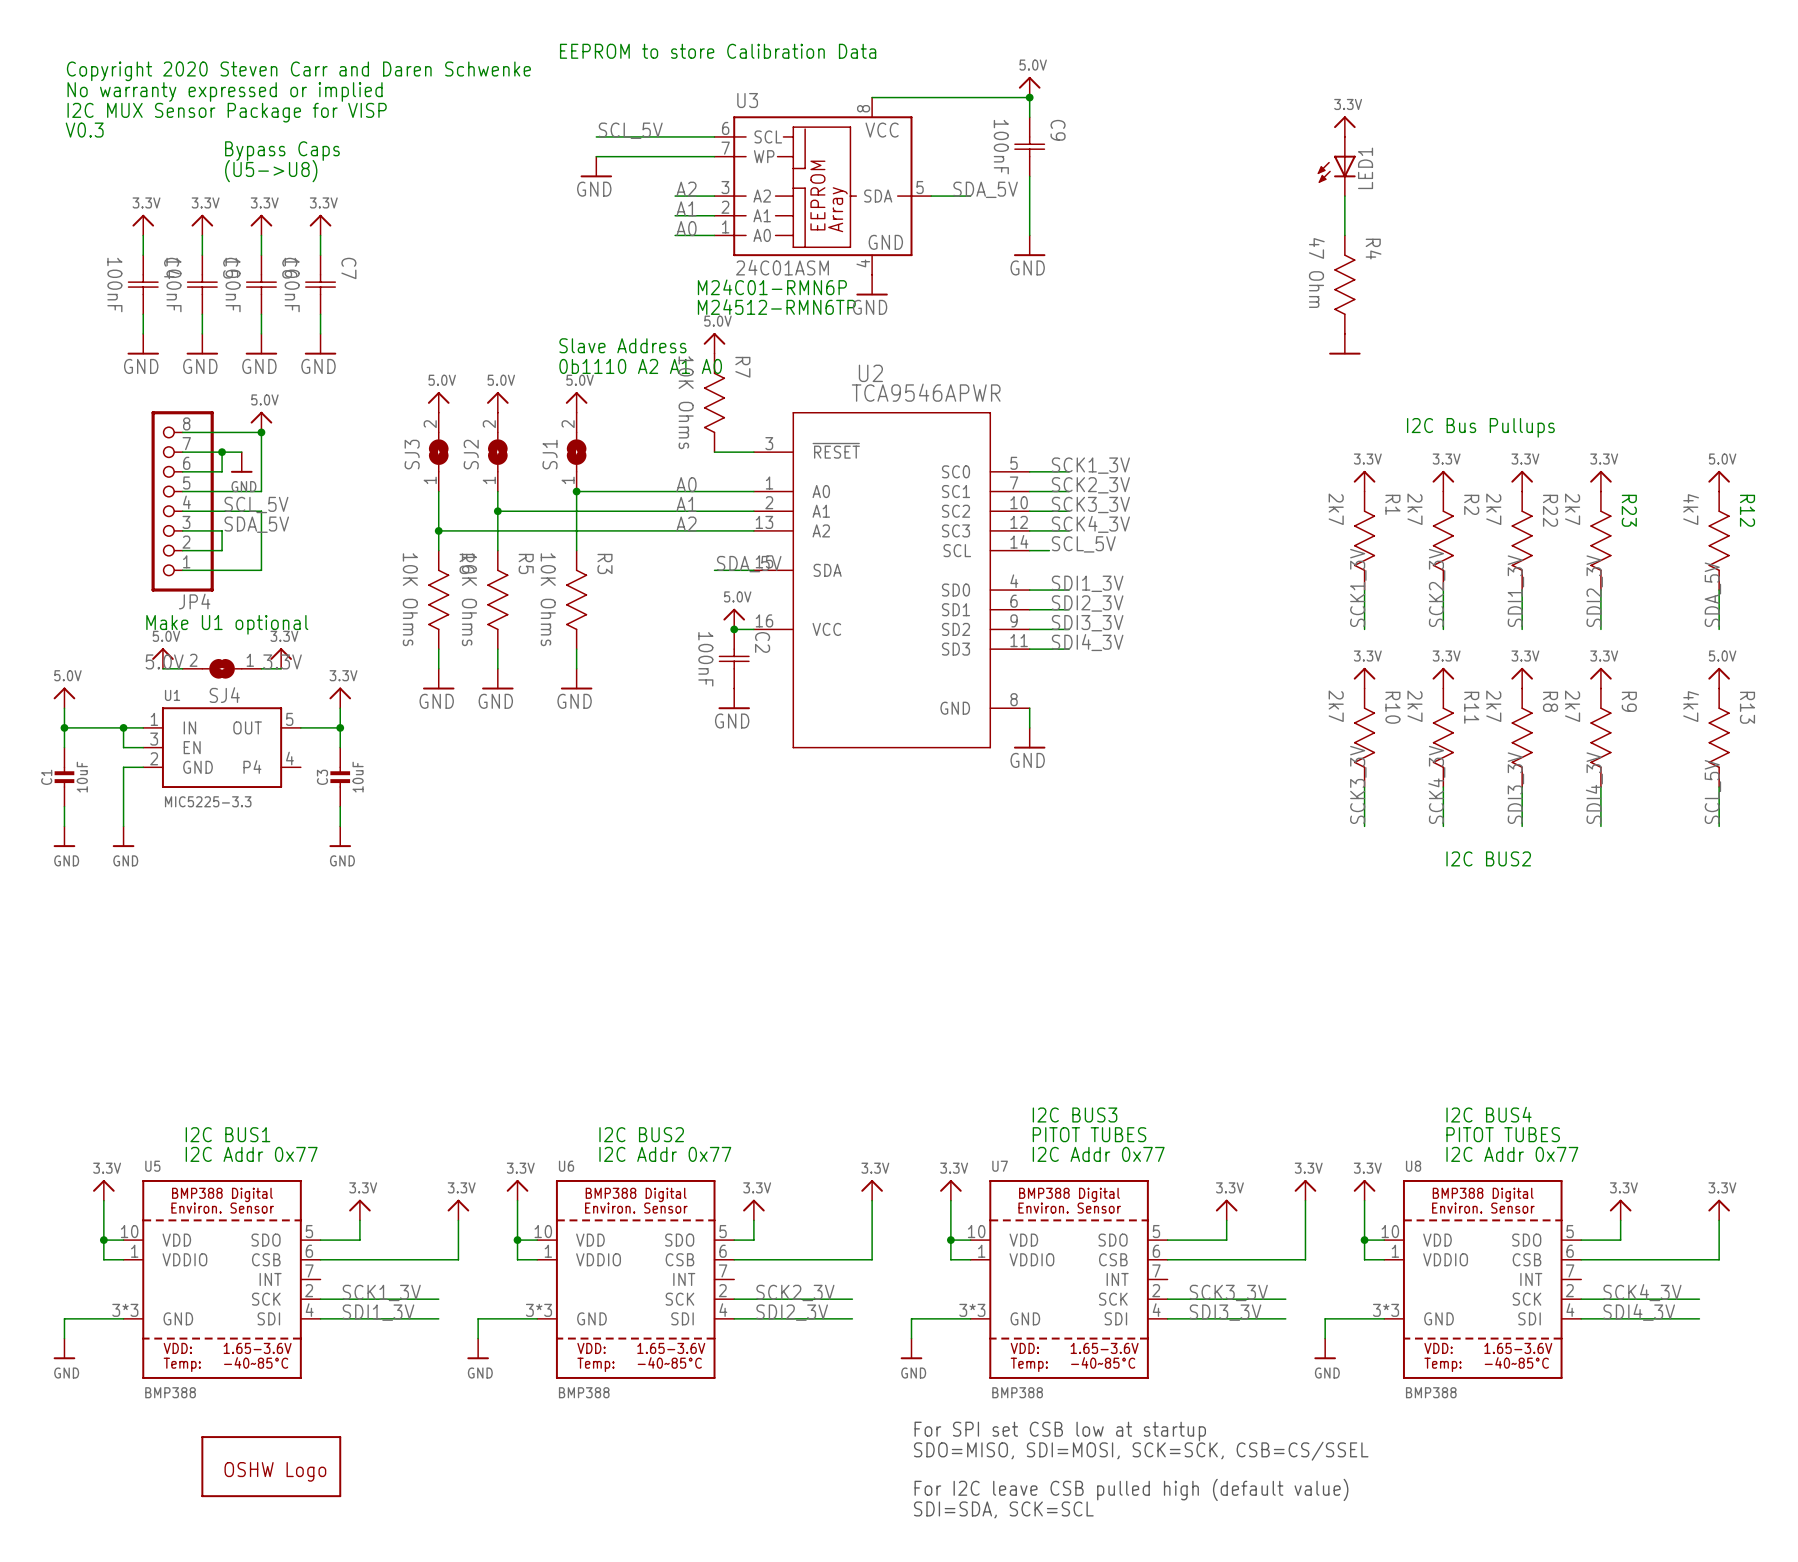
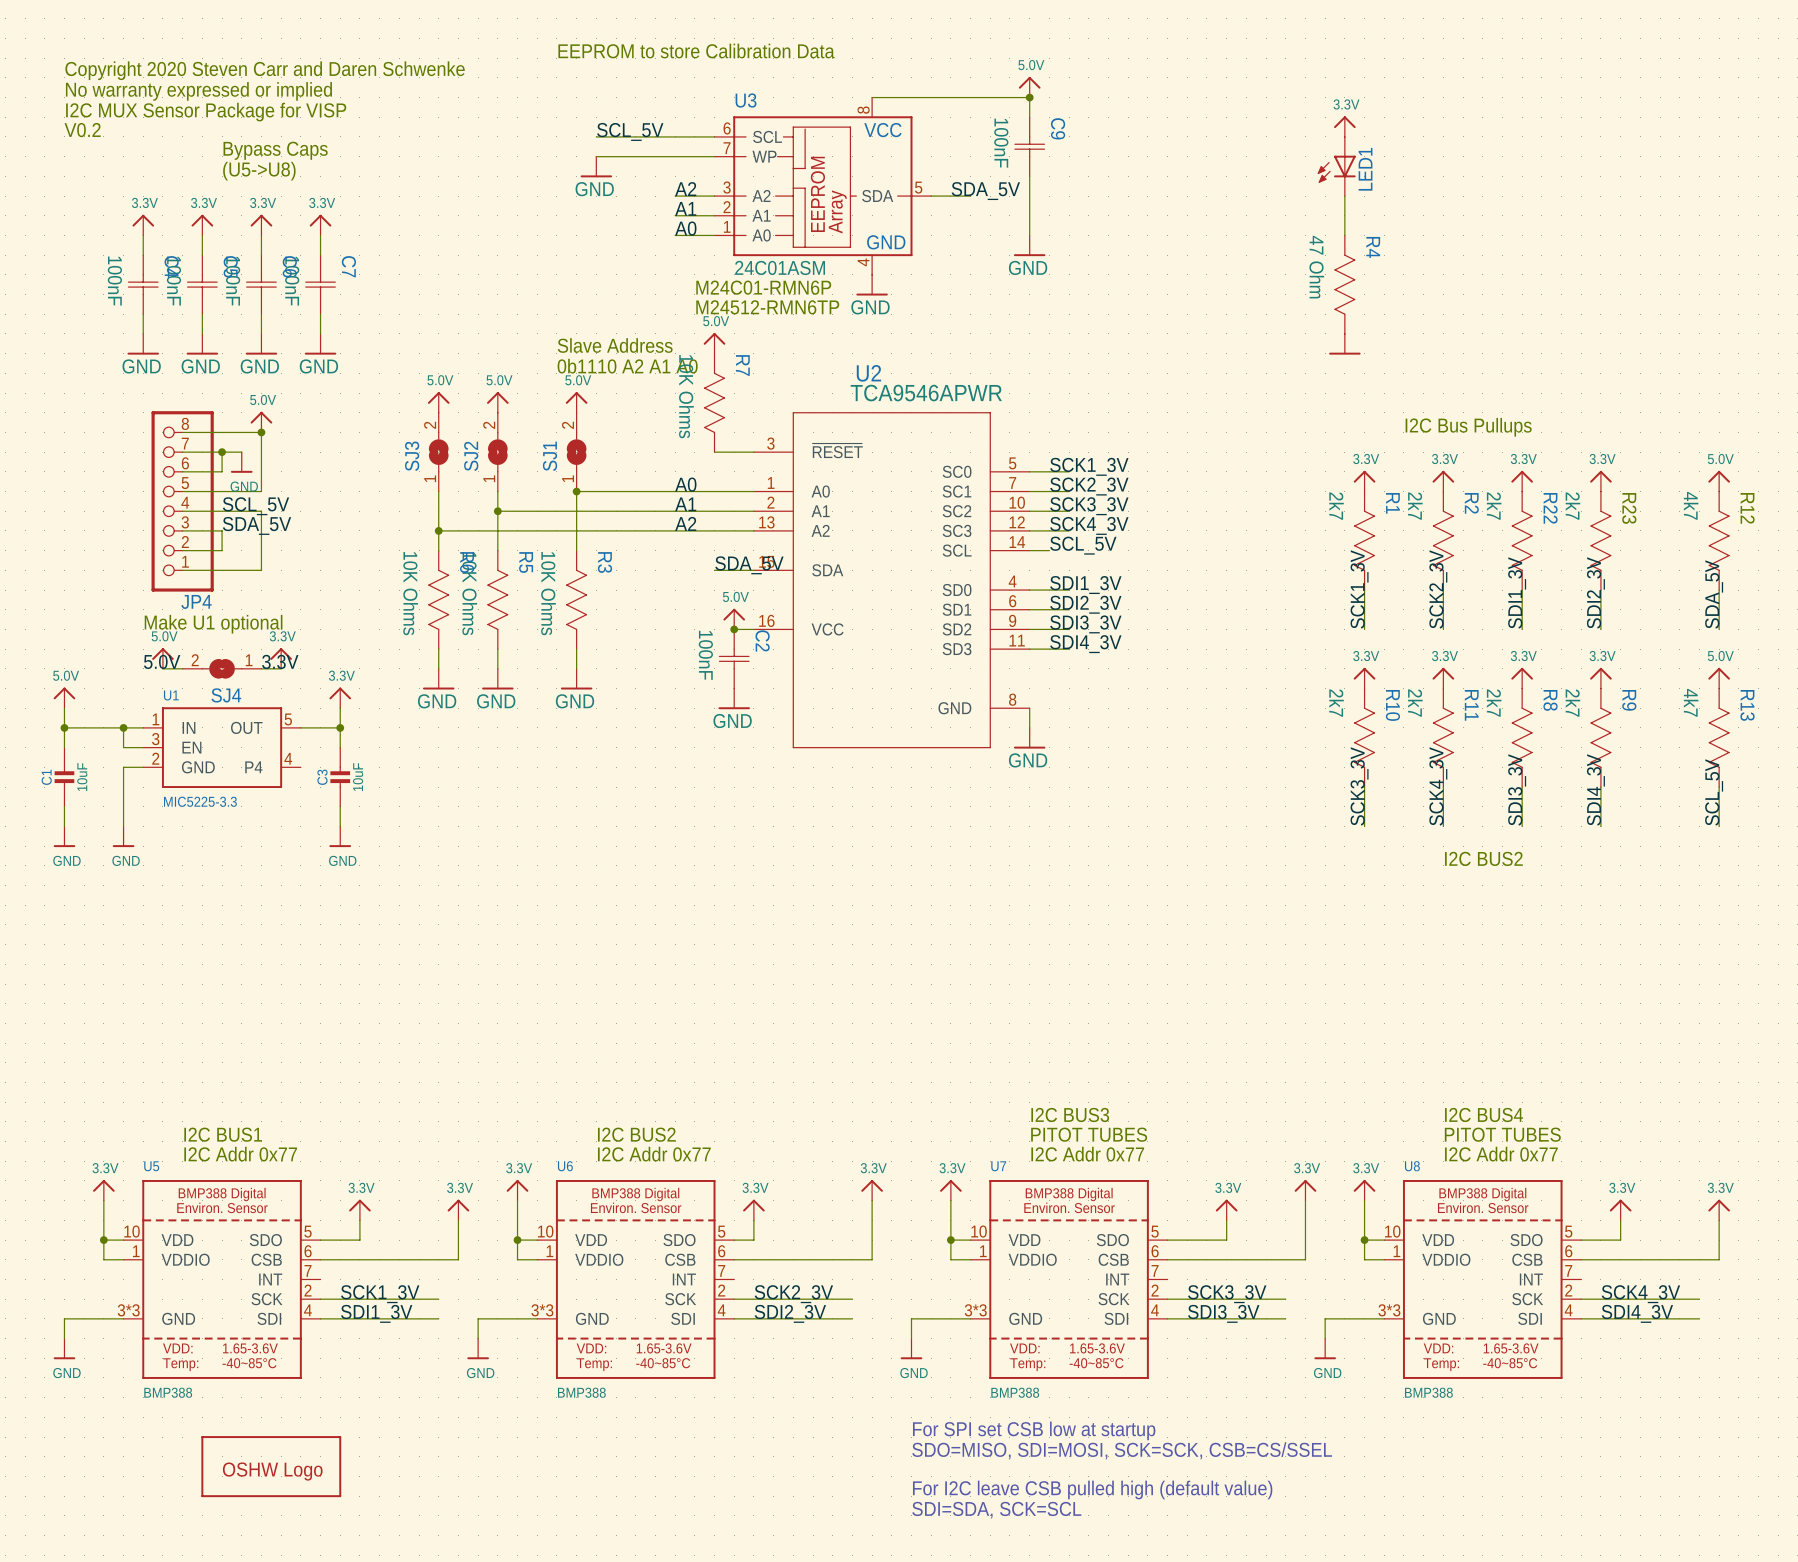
text: V0.3 (84, 130) -> V0.2 (82, 130)

